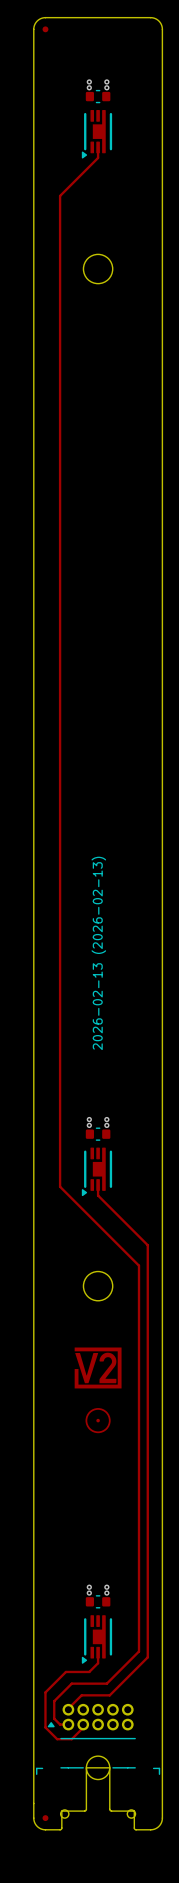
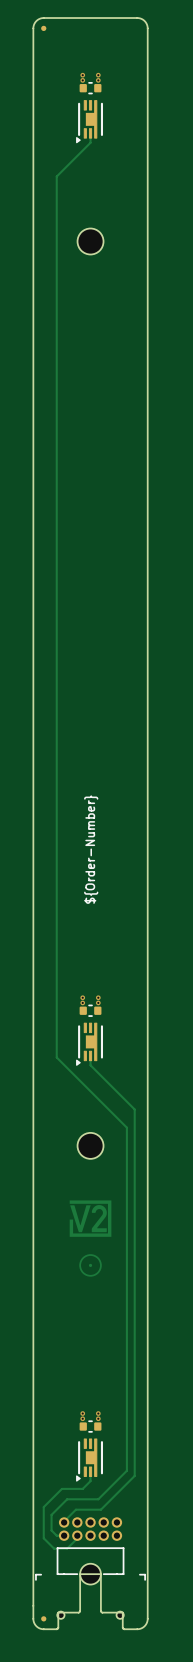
drawing shape: [91, 856, 107, 1050] -> [84, 795, 99, 904]
part footprint: [47, 1703, 136, 1769] -> [56, 1517, 125, 1575]

